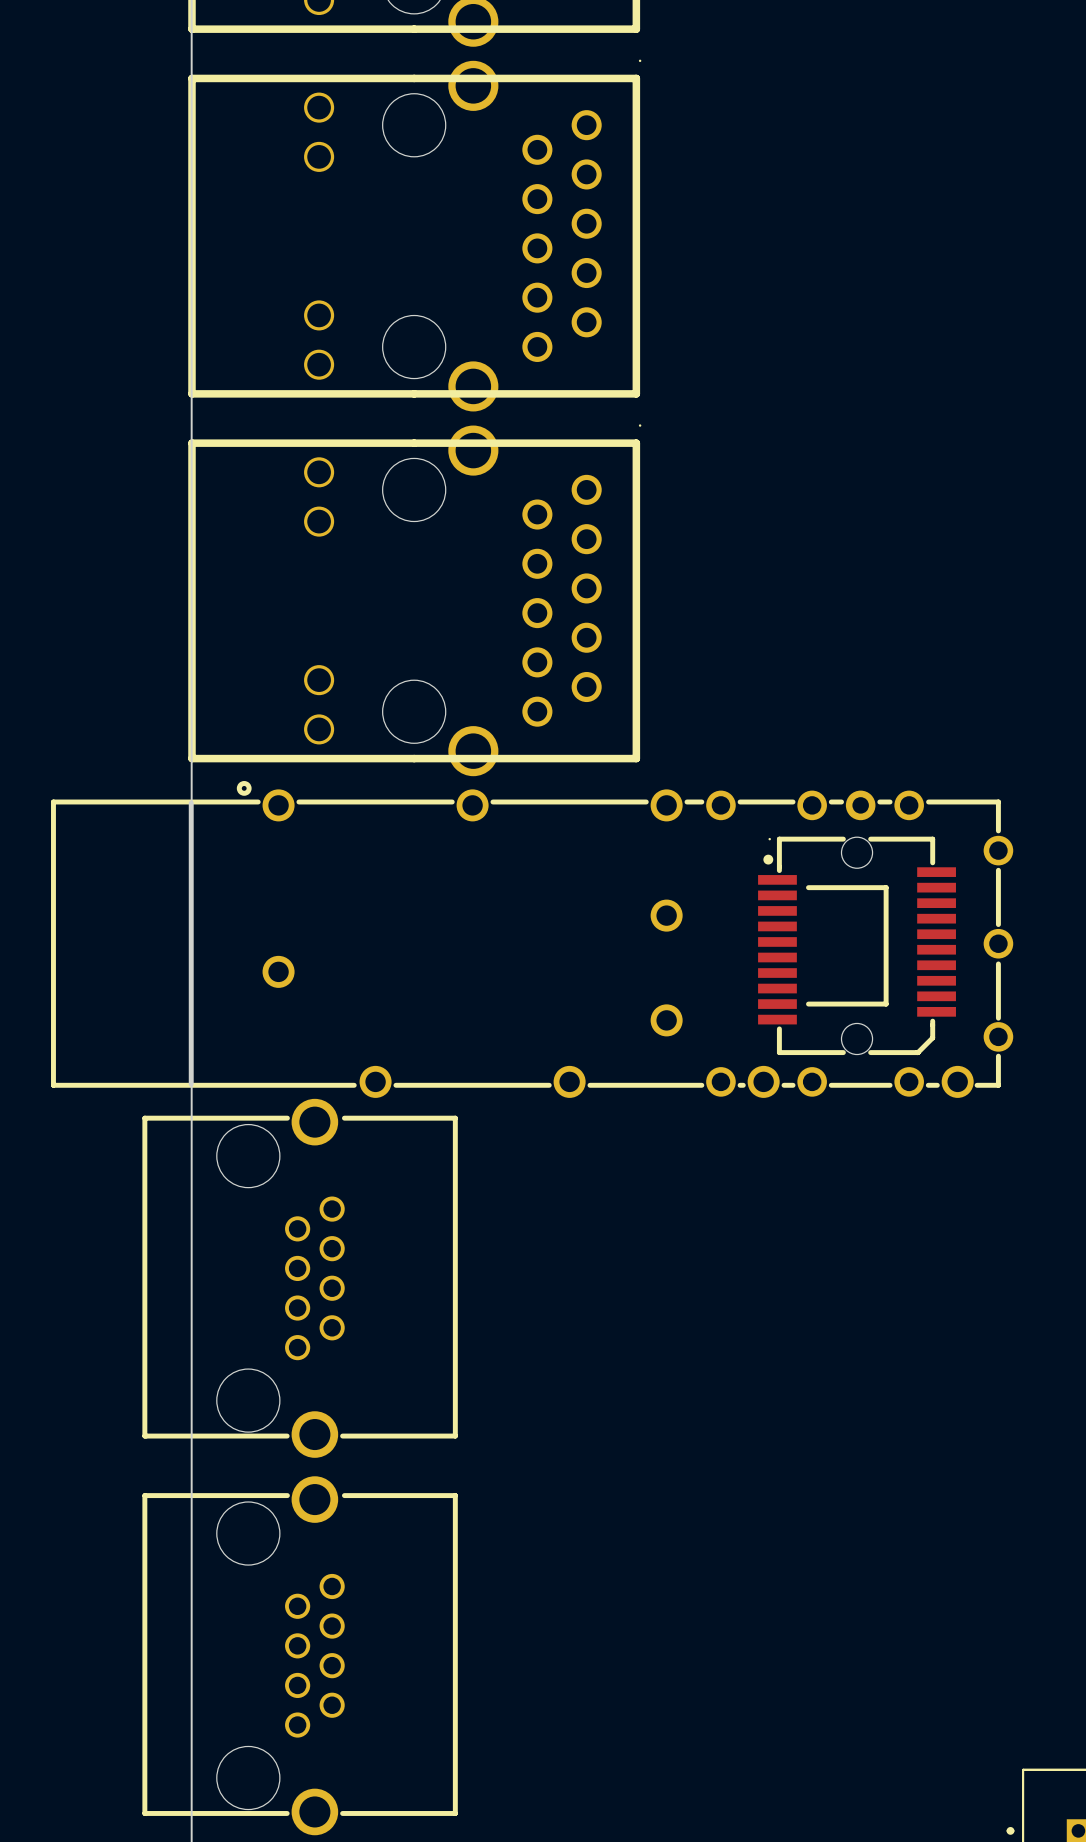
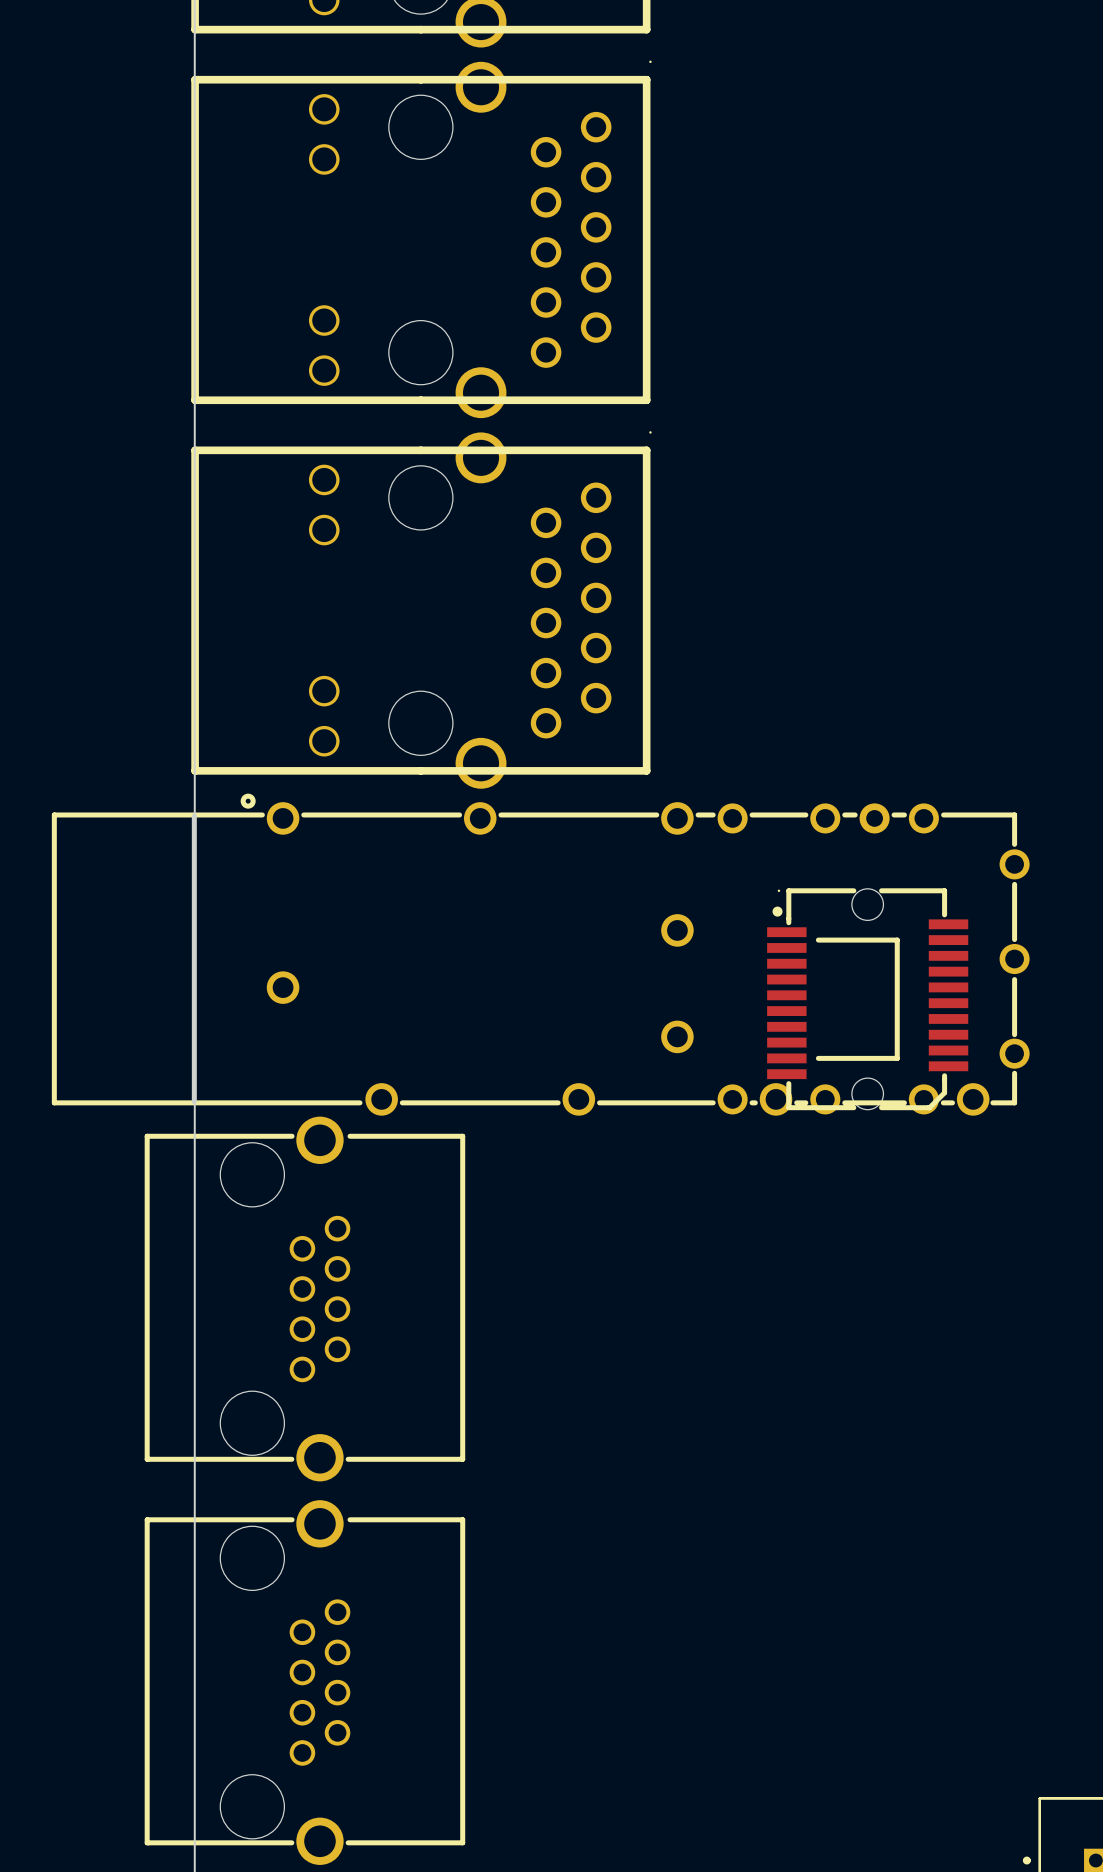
part position: (857, 945) -> (867, 999)

